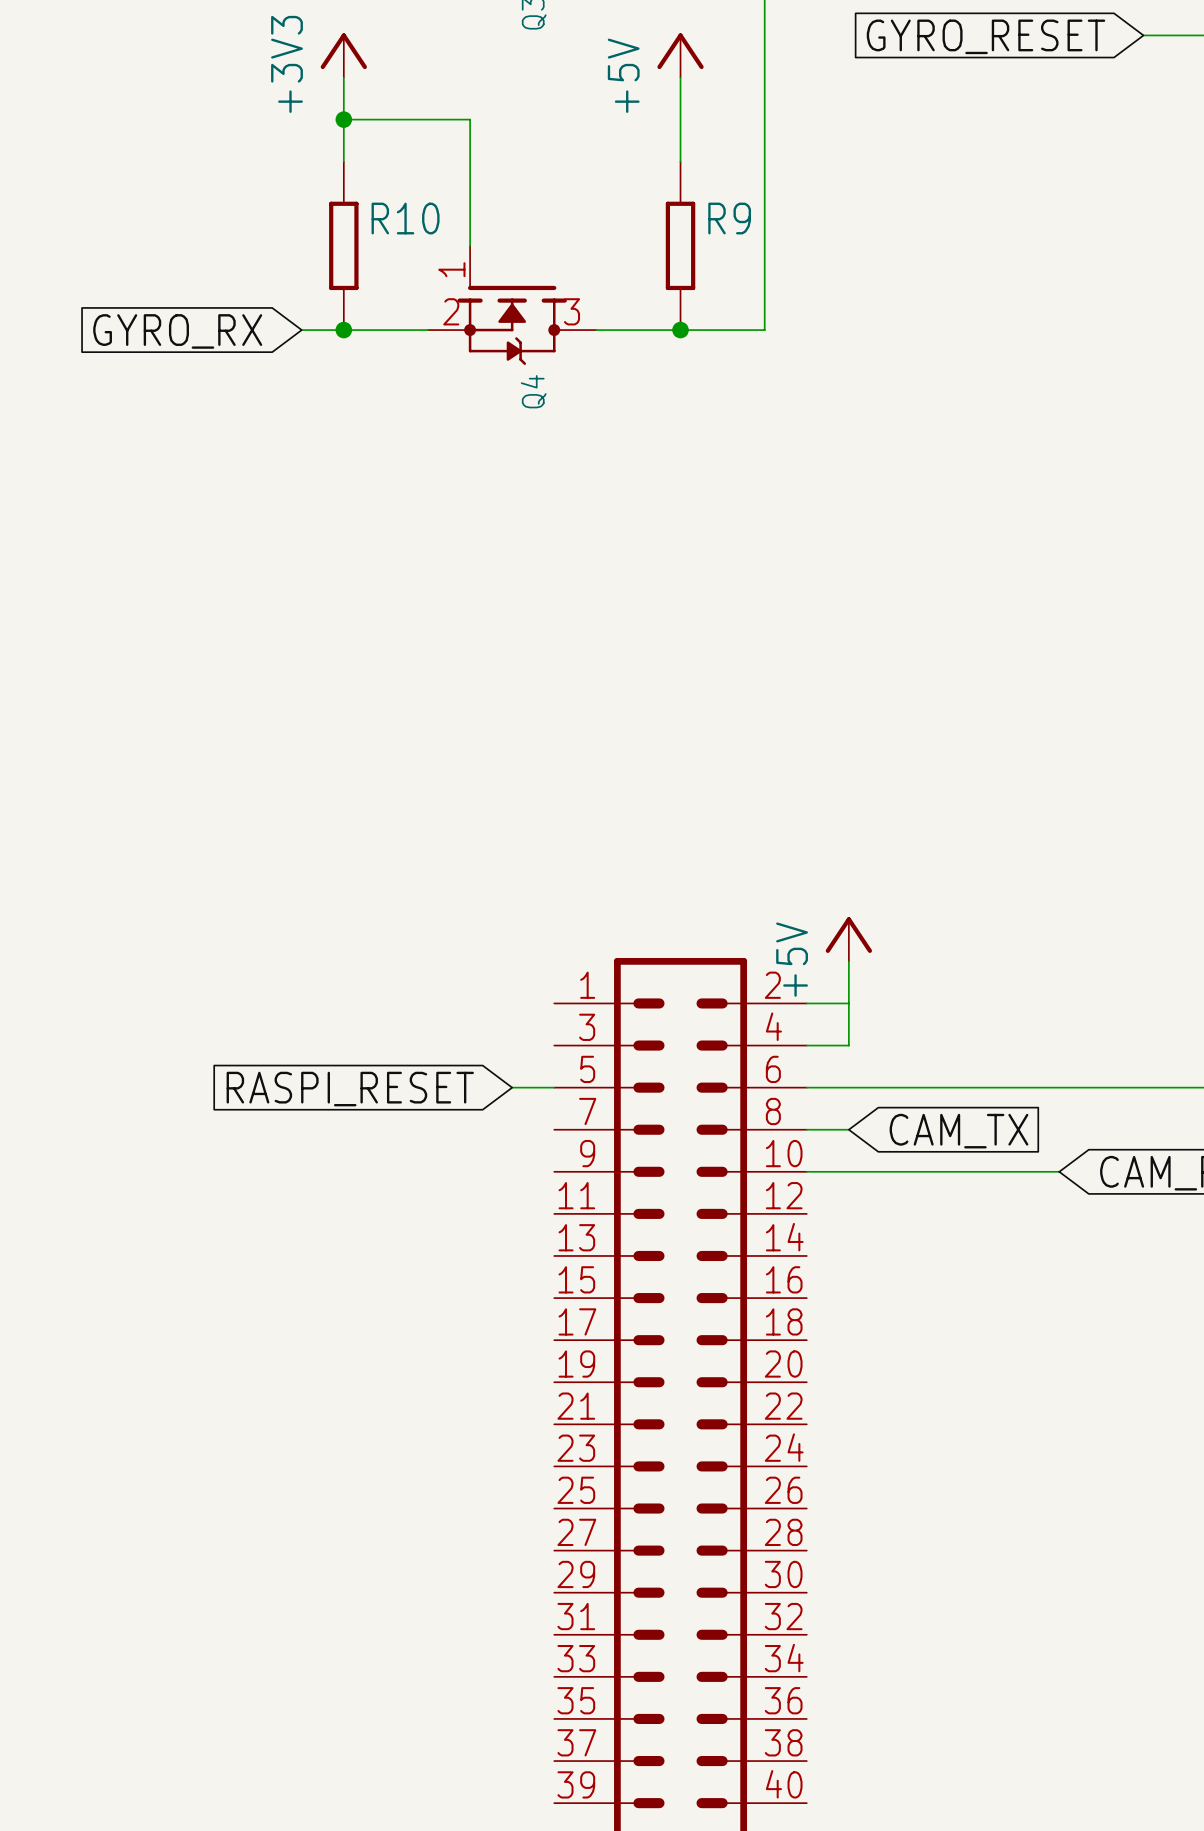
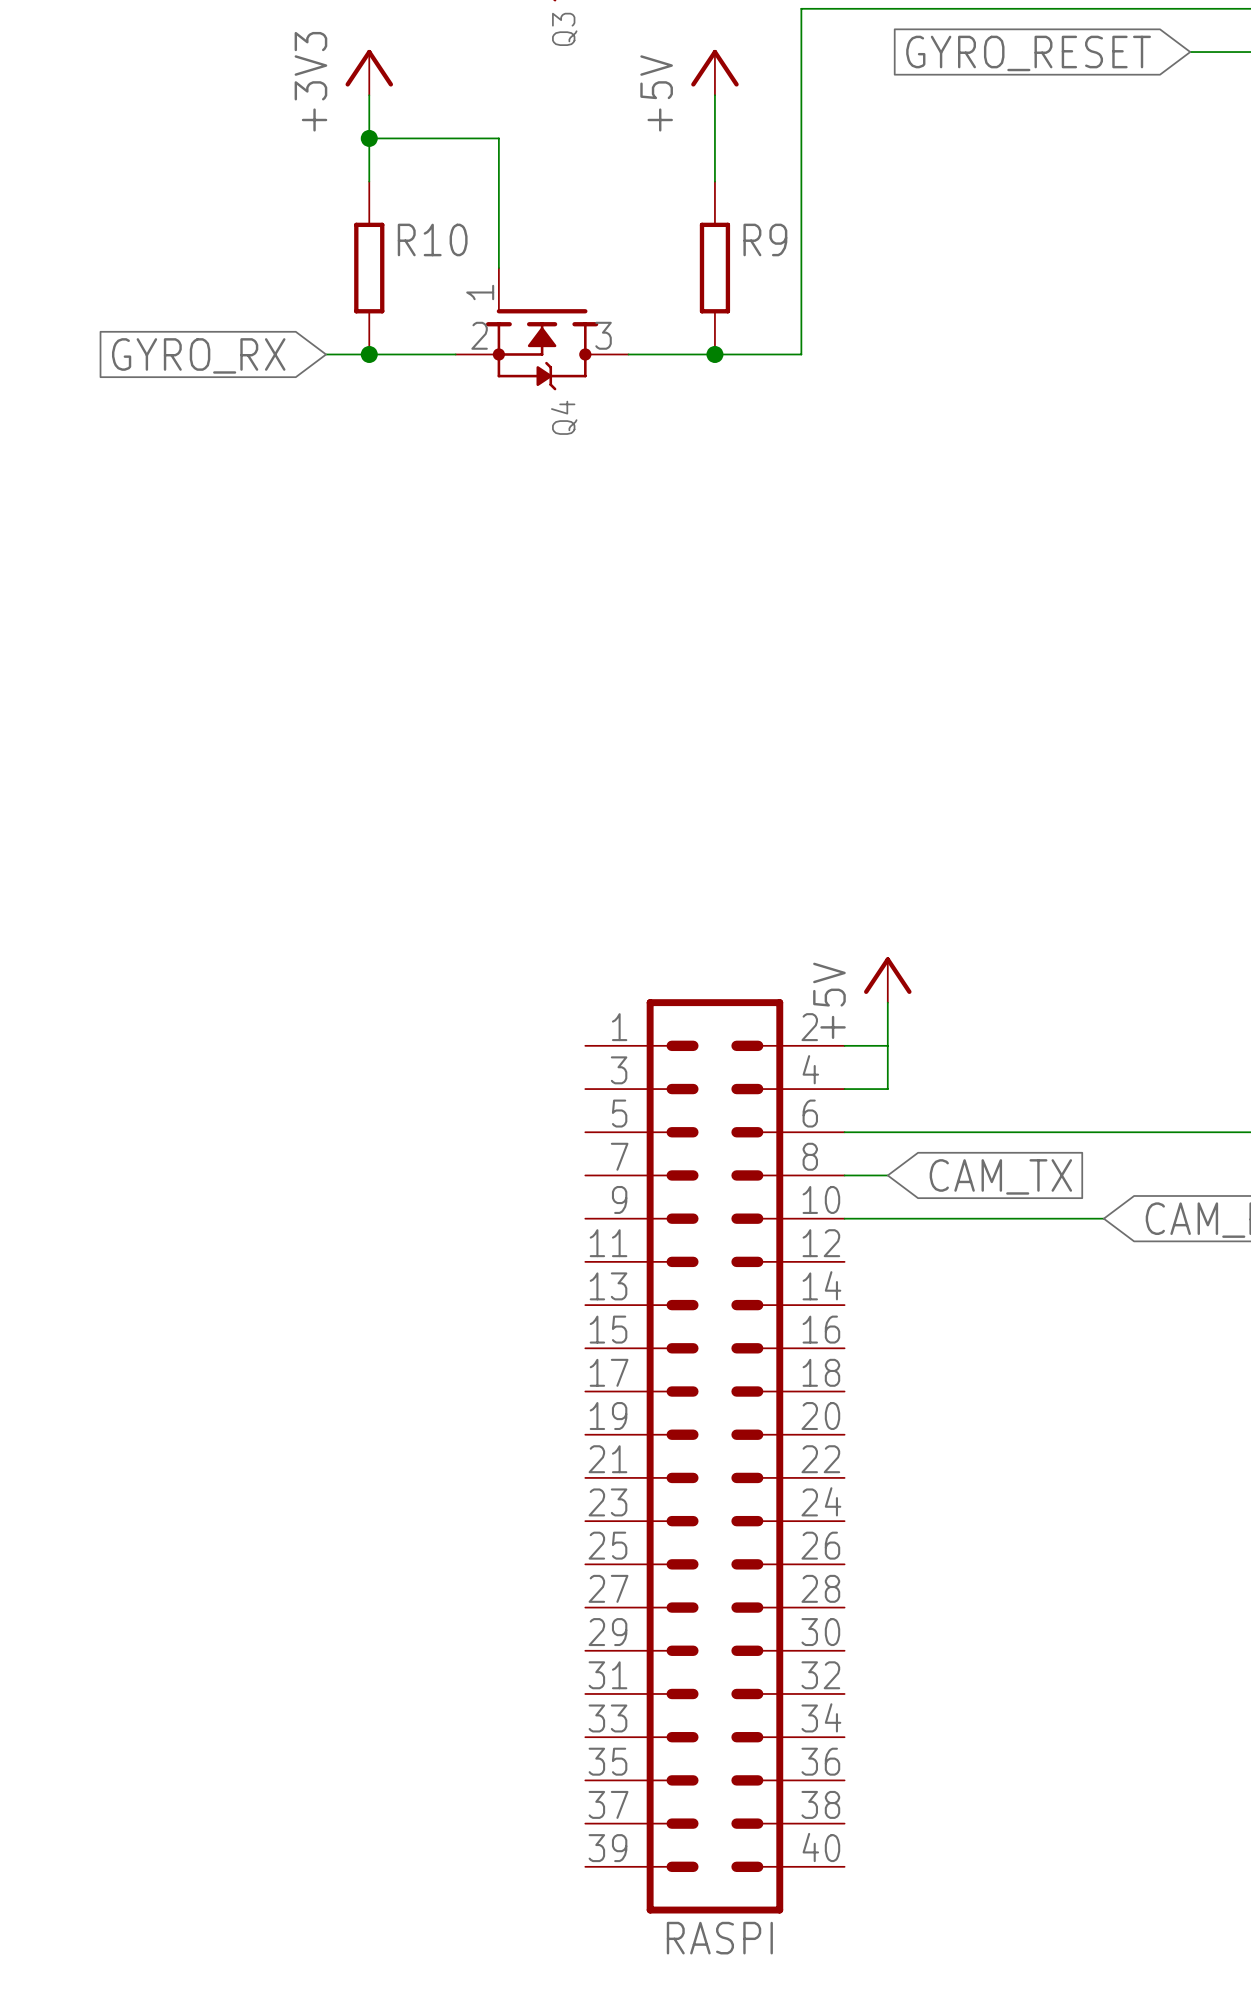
wire: (512, 1087) (554, 1087) -> none
global label: RASPI_RESET (350, 1089) -> none

